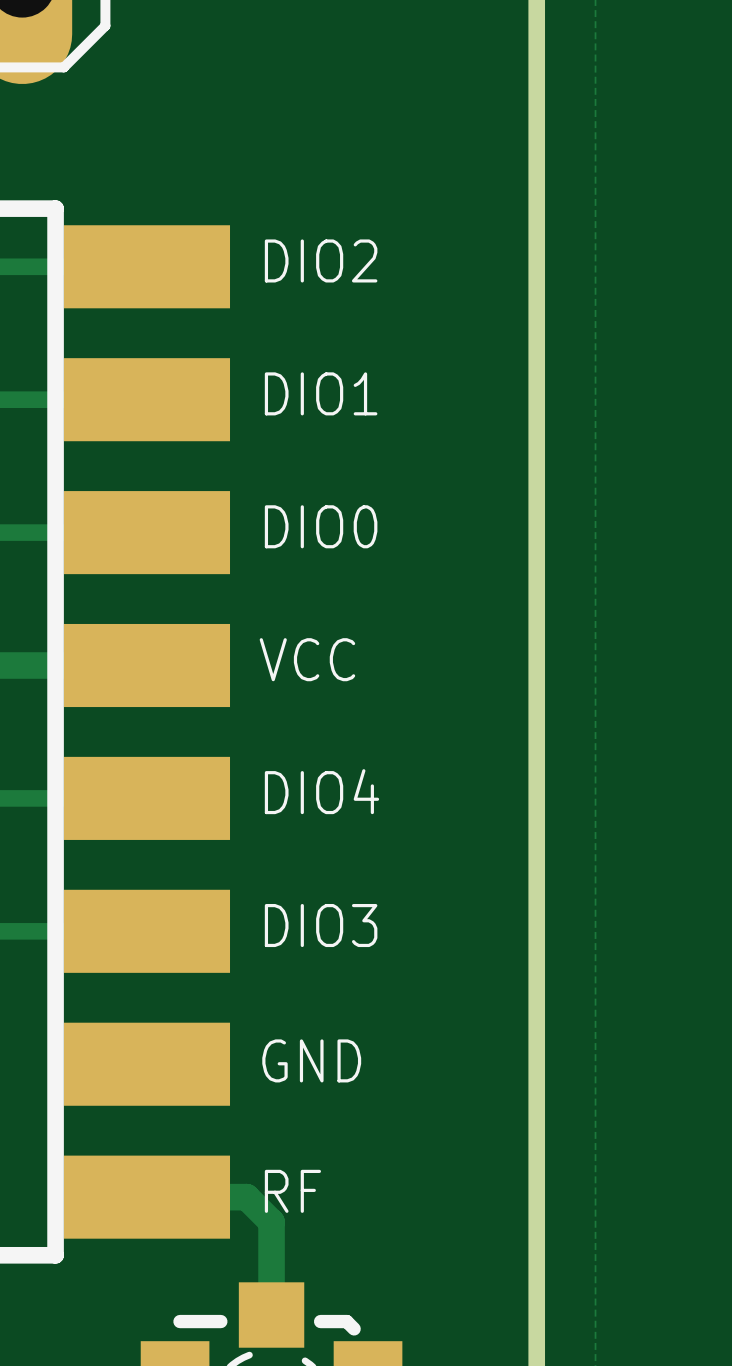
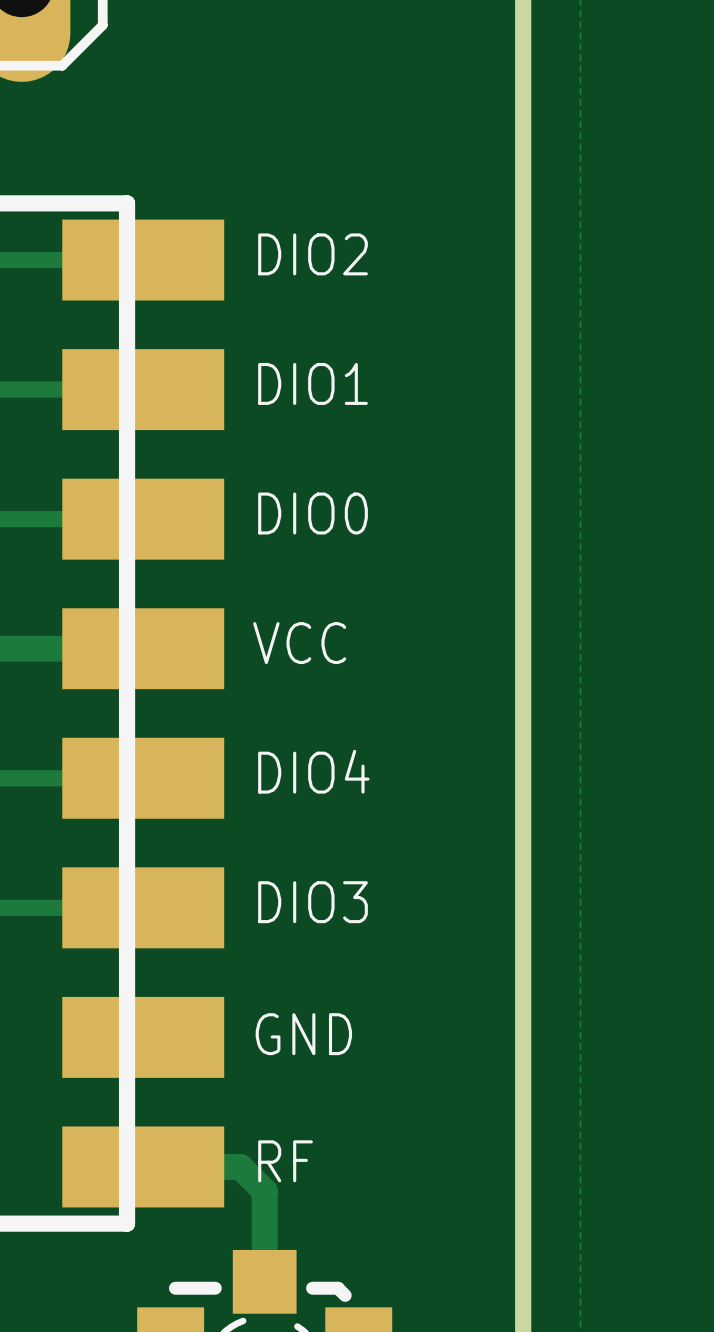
line: (55, 208) (55, 1255) -> (54, 203) (127, 203) (127, 1223) (54, 1223)

